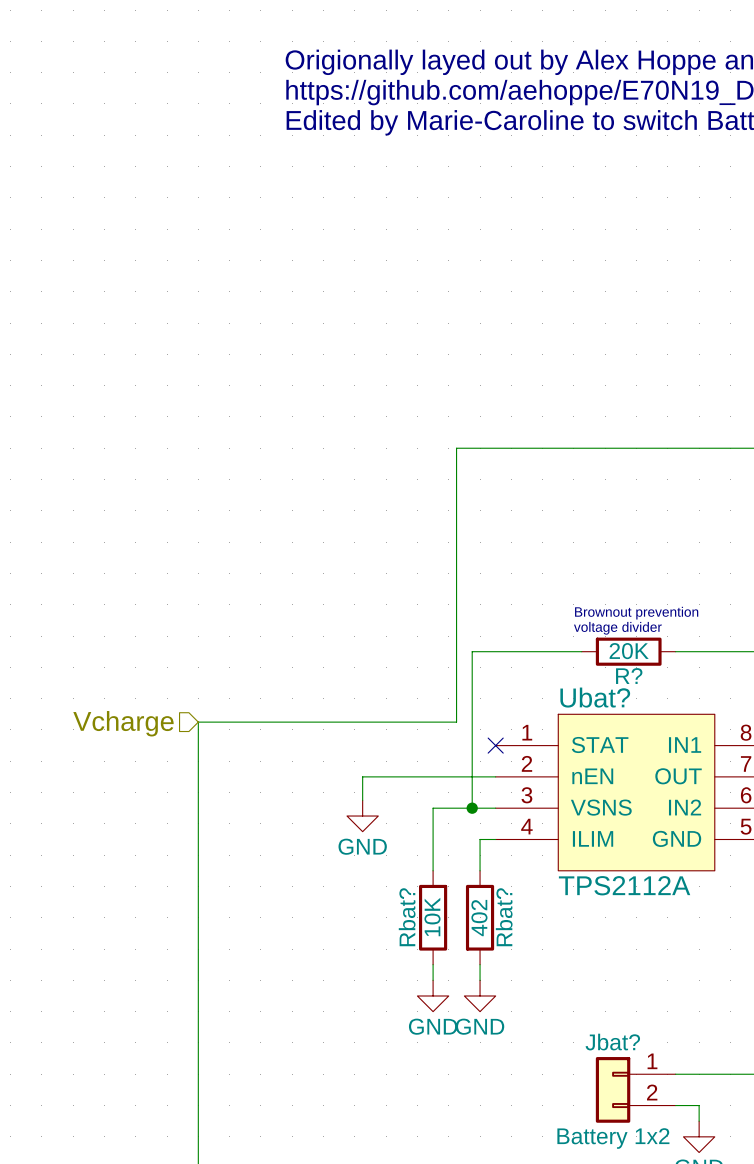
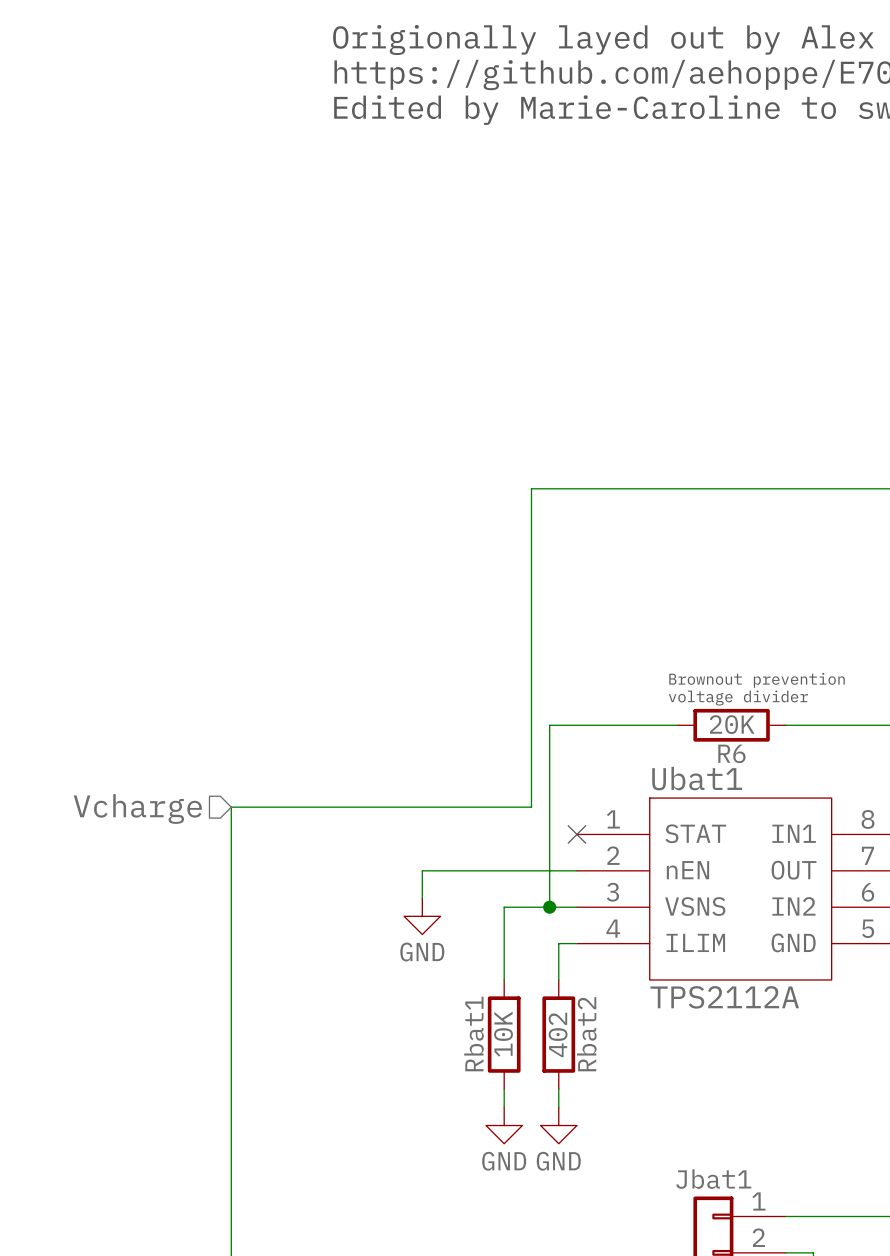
R? name: R? (629, 676) -> R6 (731, 753)
Ubat? name: Ubat? (595, 697) -> Ubat1 (697, 778)
Rbat? name: Rbat? (407, 917) -> Rbat1 (474, 1034)
Rbat? name: Rbat? (504, 917) -> Rbat2 (586, 1034)
Jbat? name: Jbat? (612, 1042) -> Jbat1 (713, 1179)

